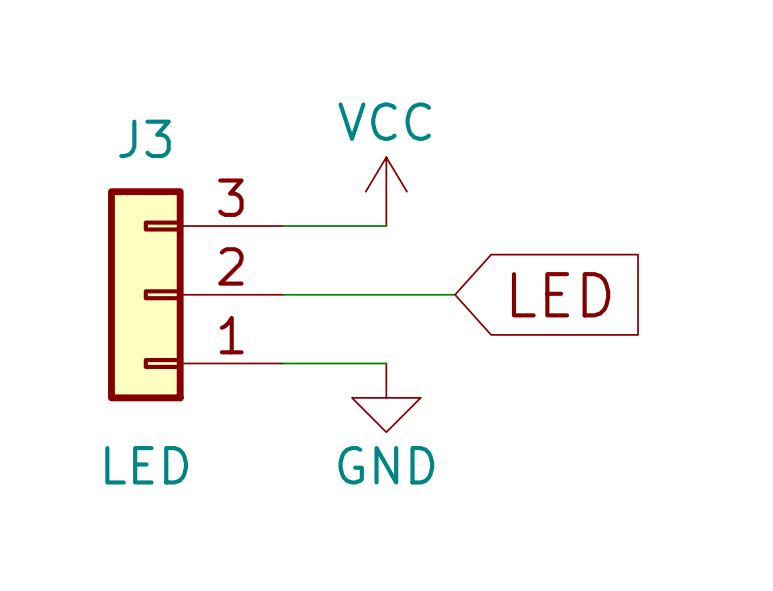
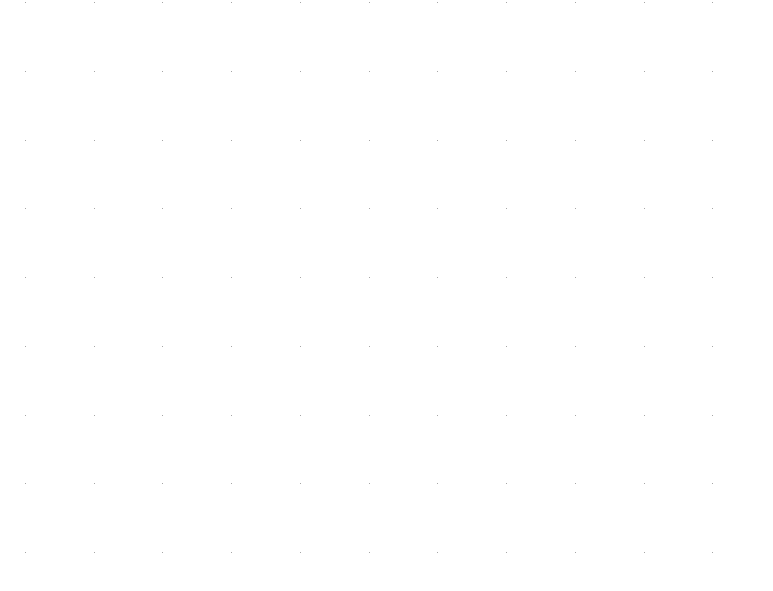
power symbol: VCC (386, 191) -> none
wire: (283, 226) (386, 226) -> none
J3: LED (195, 294) -> none
wire: (283, 294) (455, 294) -> none
global label: LED (561, 294) -> none
wire: (283, 363) (386, 363) -> none
power symbol: GND (386, 397) -> none

